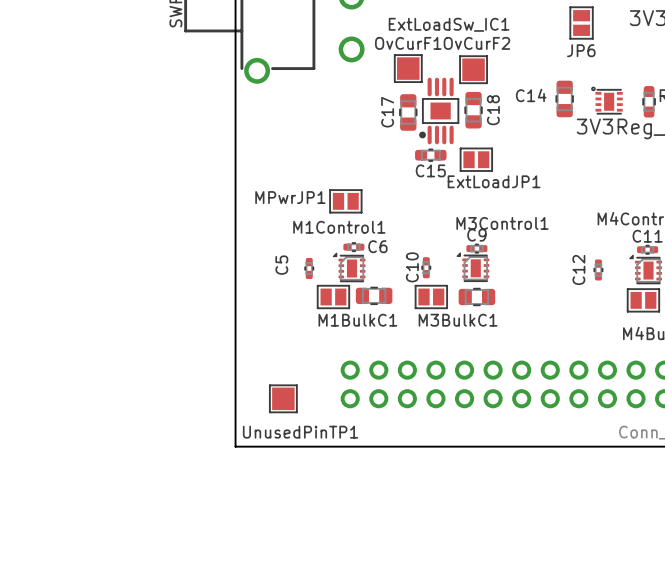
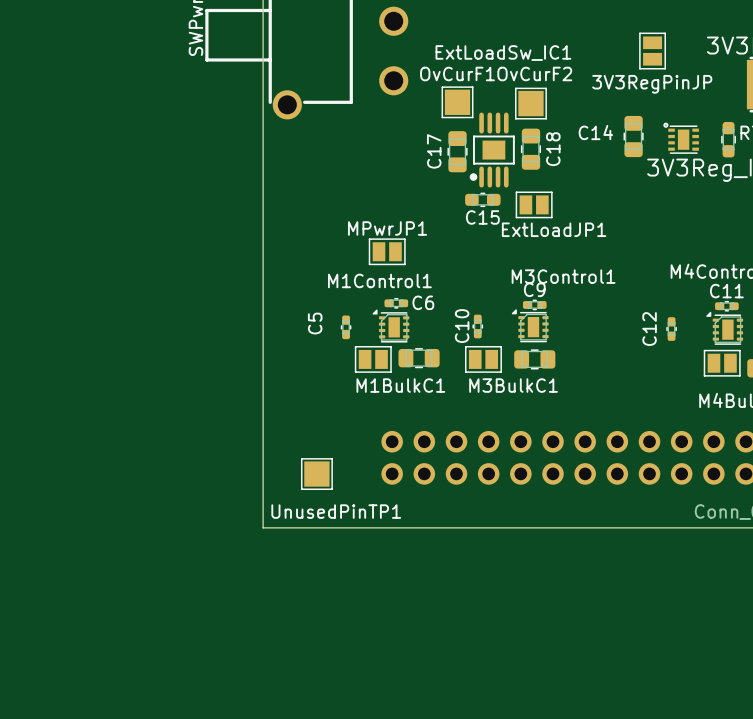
JP6 name: JP6 (581, 50) -> 3V3RegPinJP (652, 84)
MPwrJP1 name position: MPwrJP1 (290, 197) -> MPwrJP1 (387, 228)

